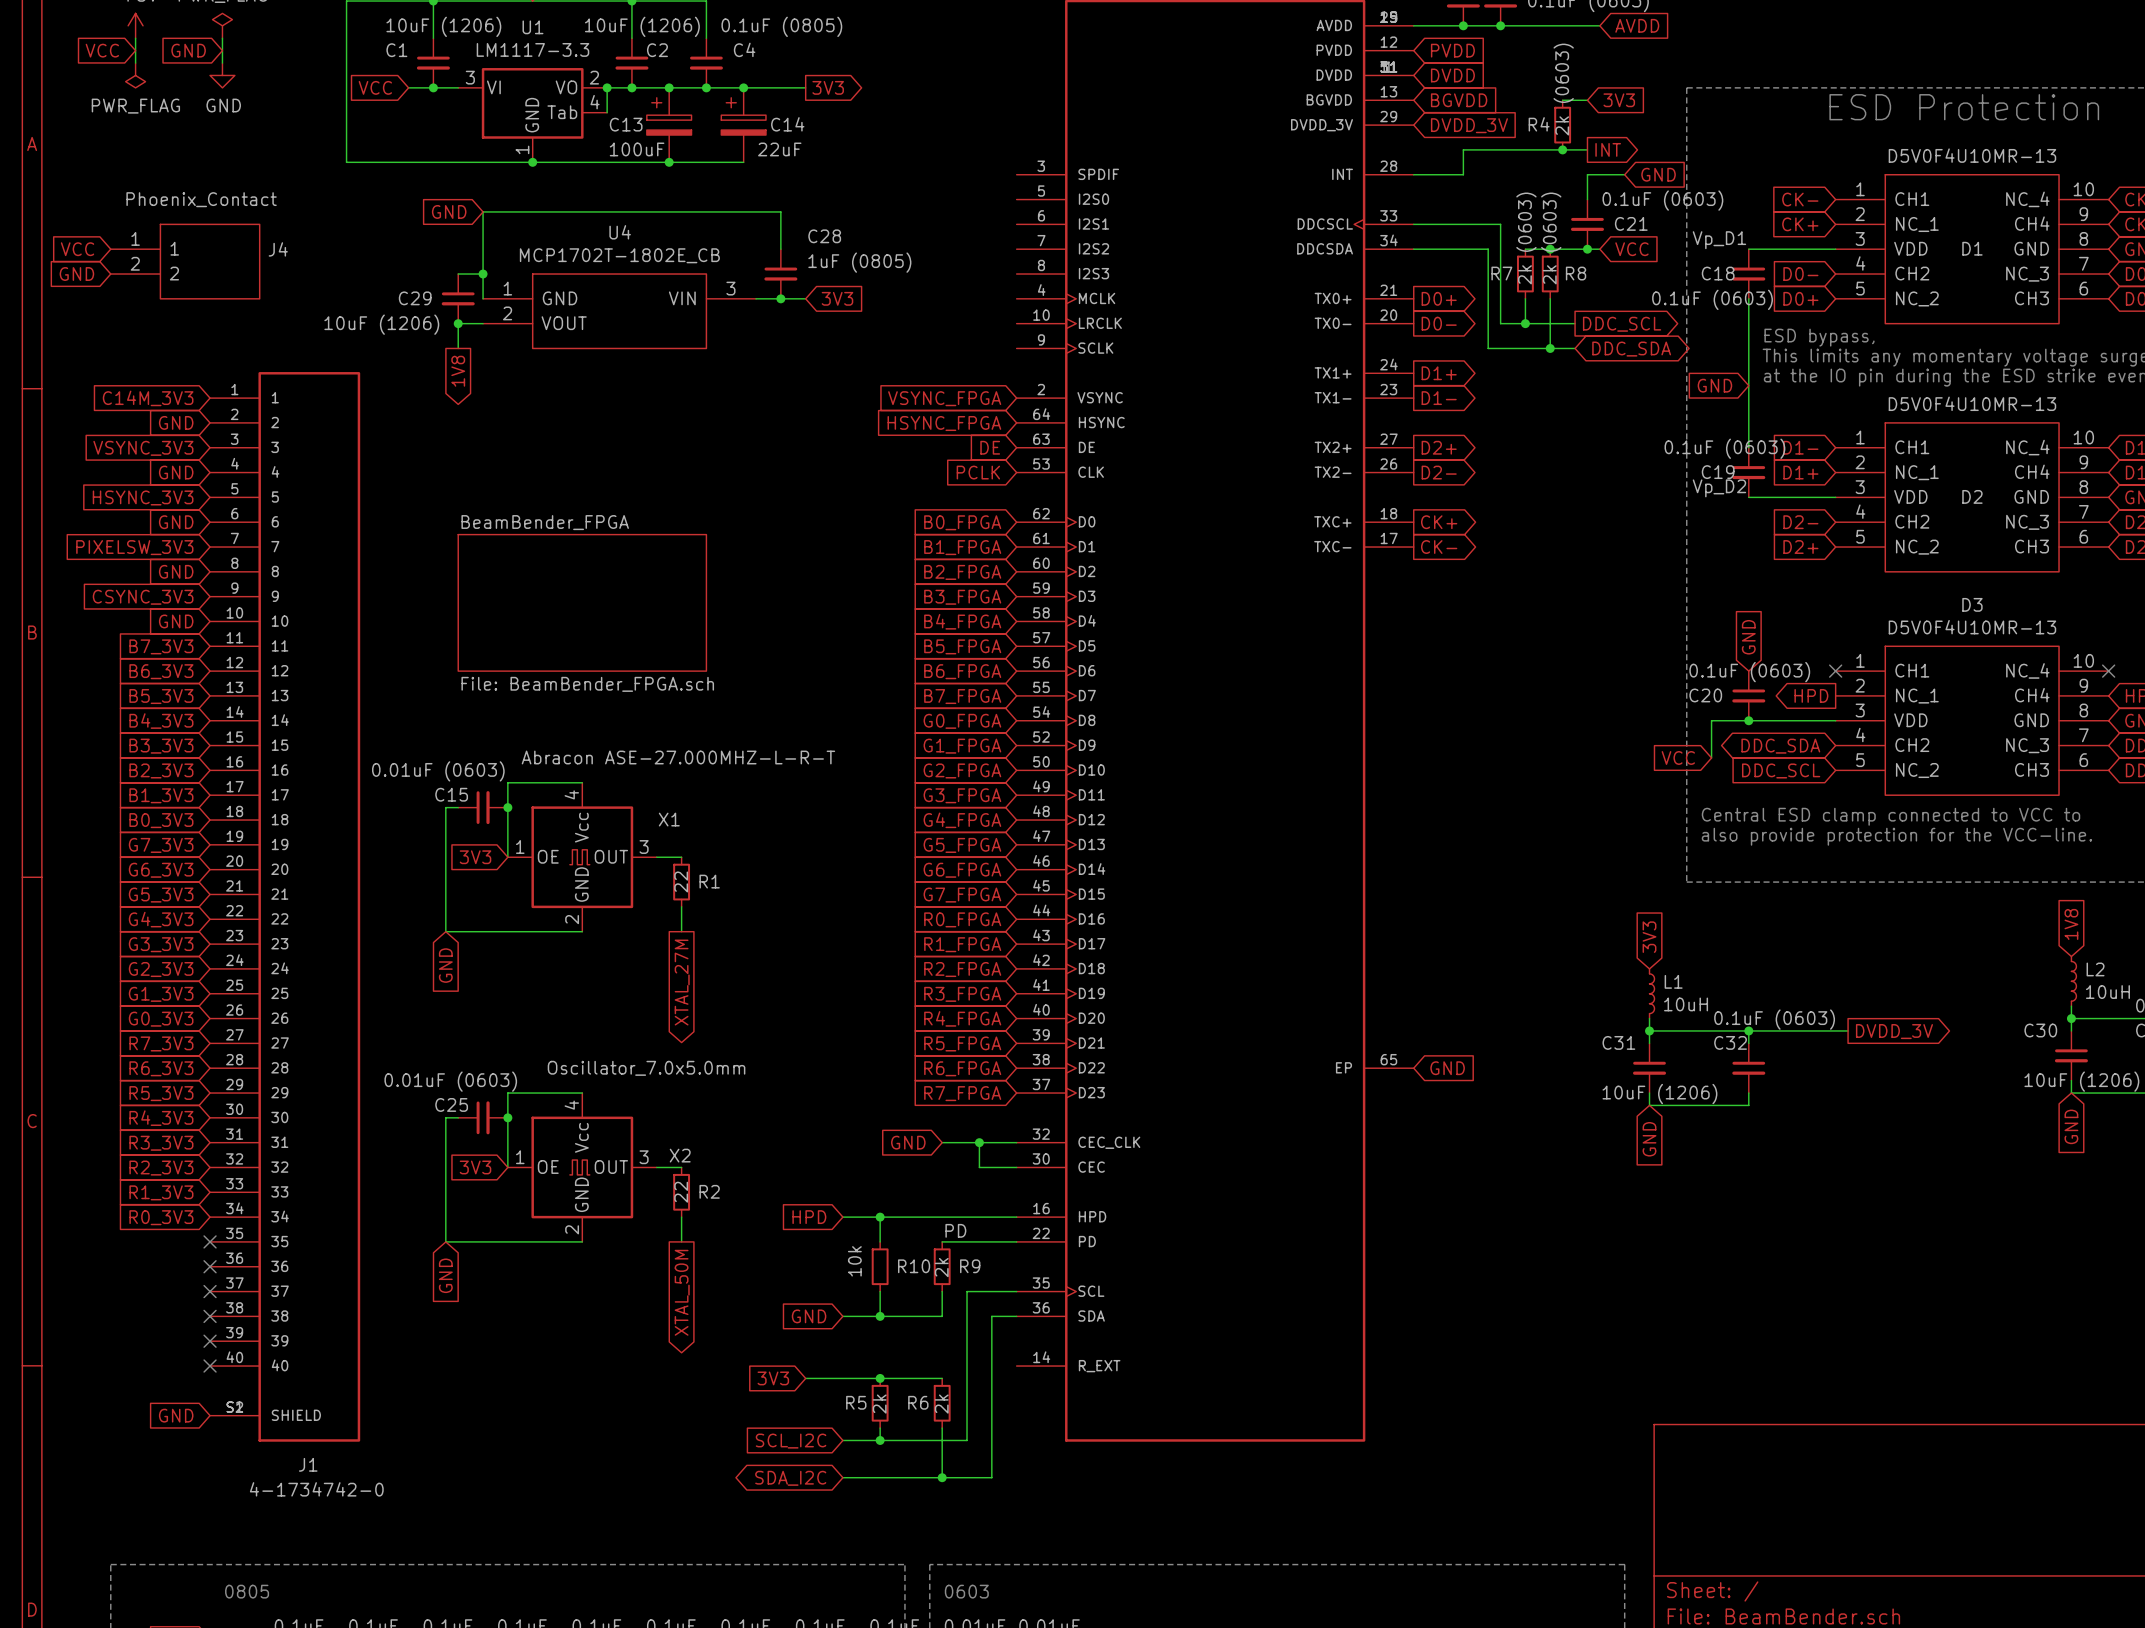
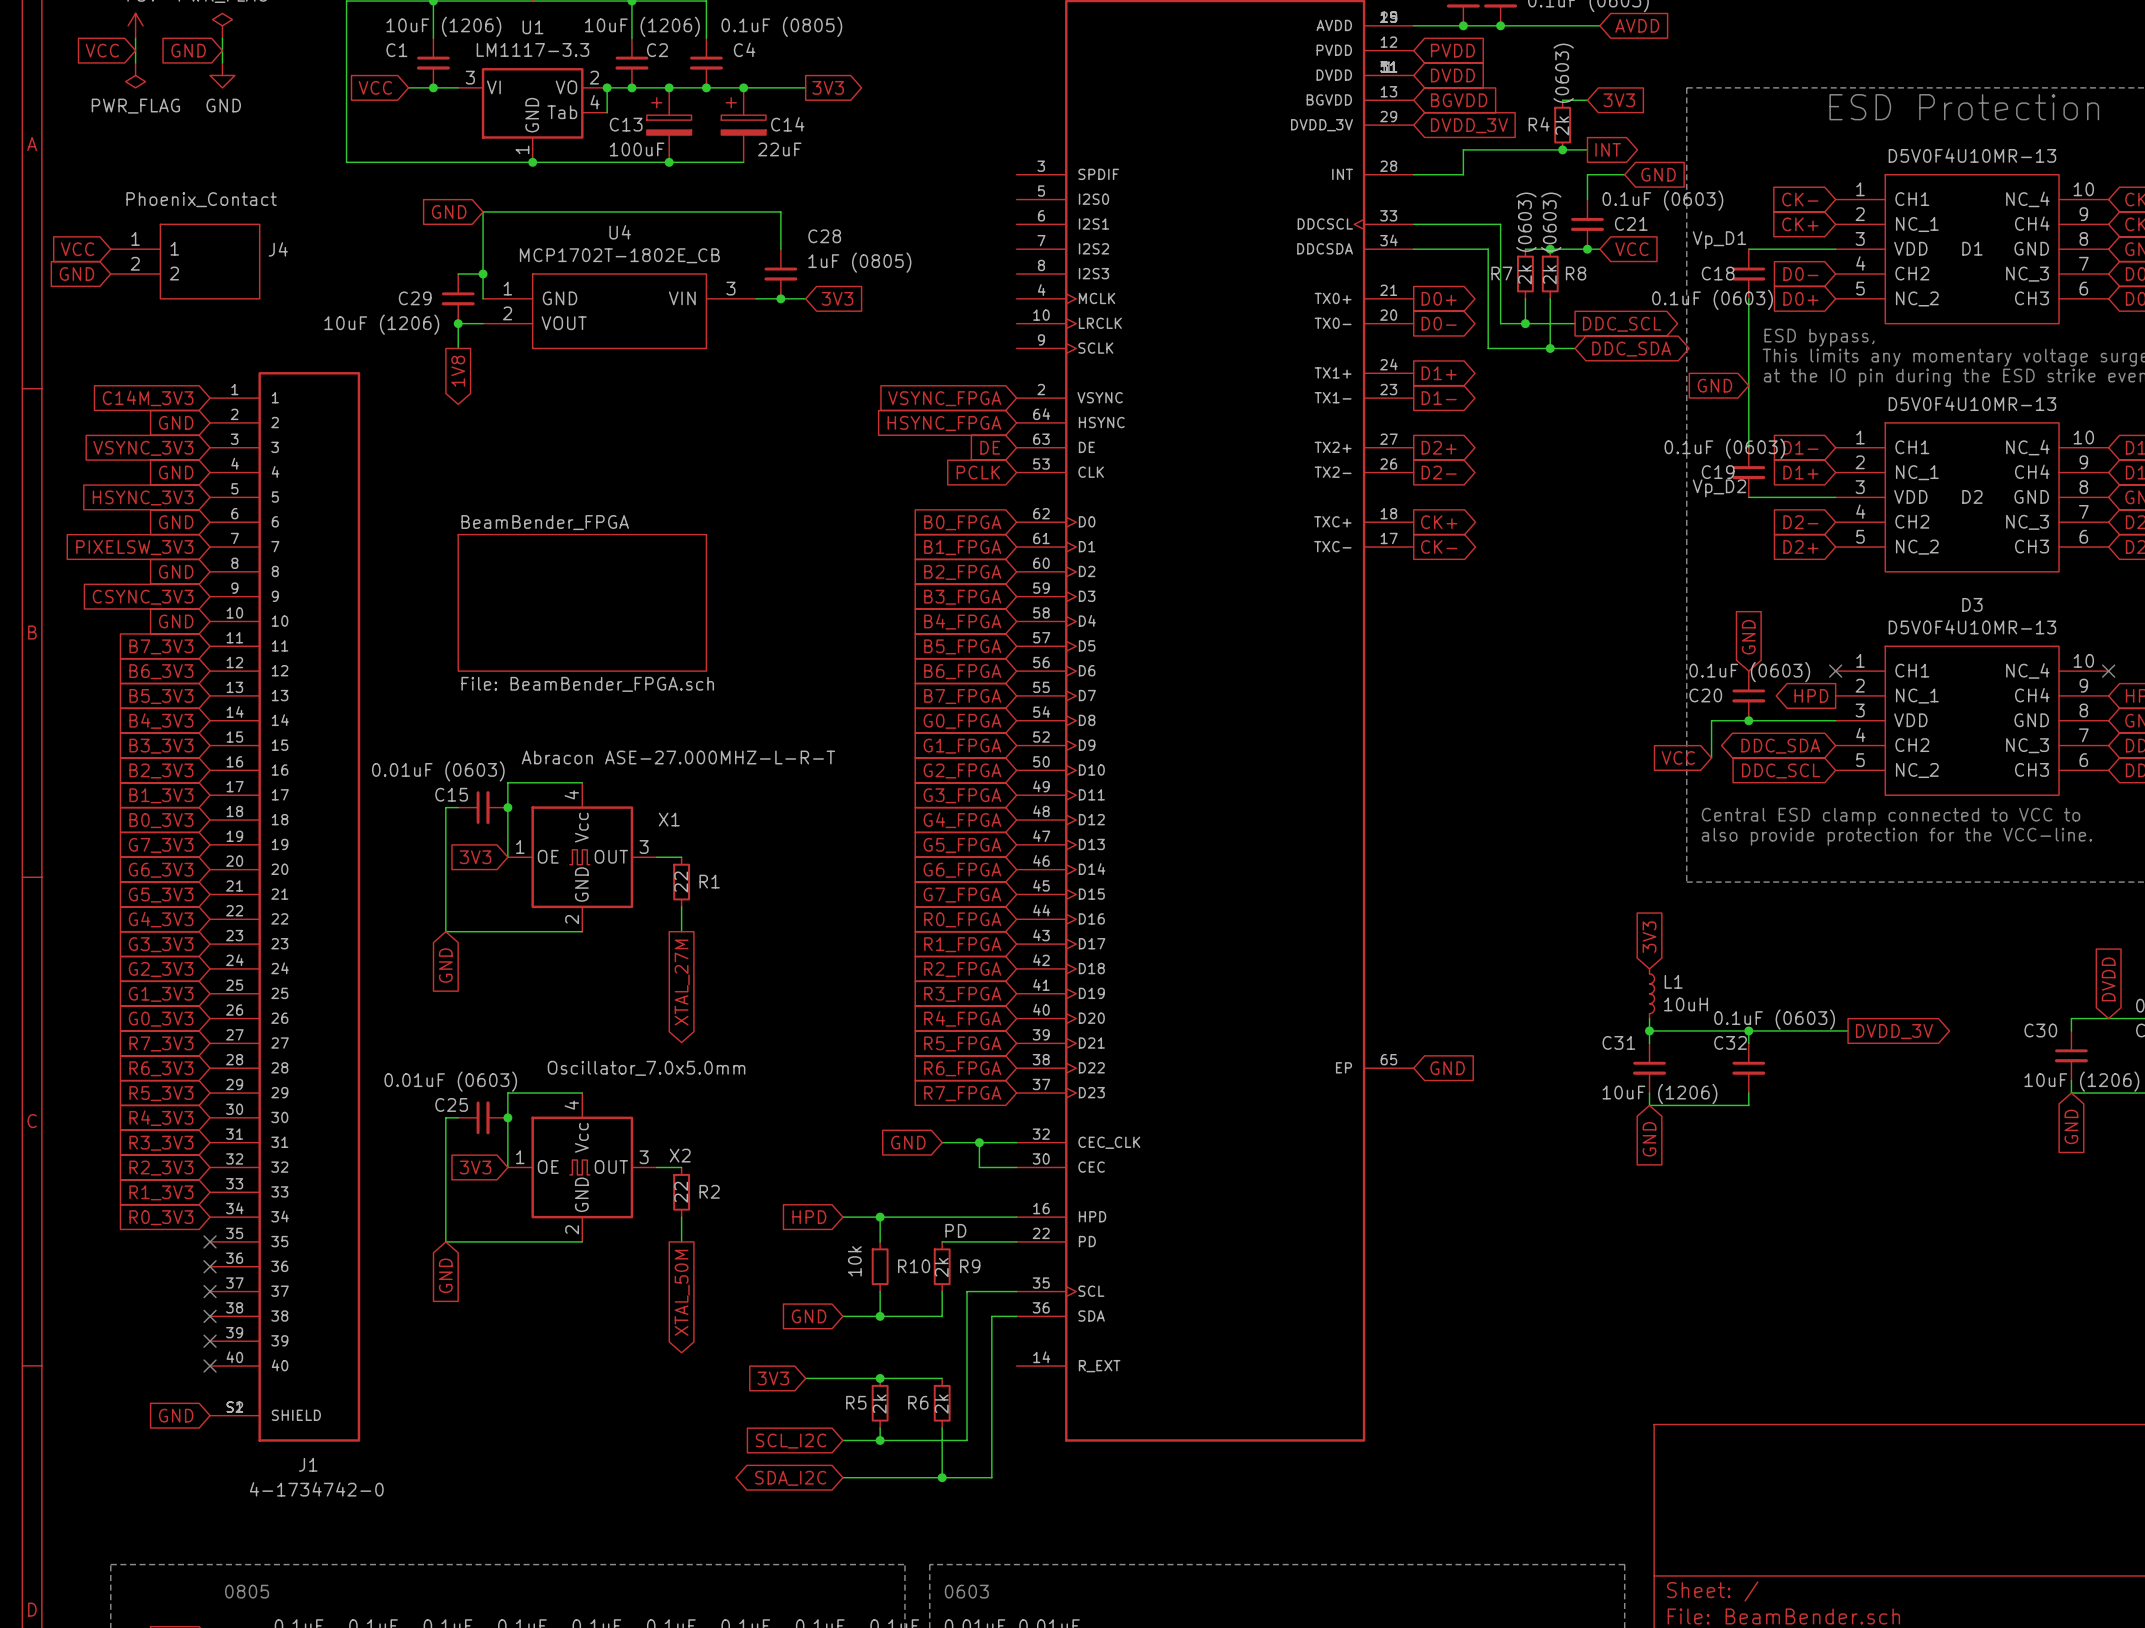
global label: 1V8 (2071, 924) -> none
global label: none -> DVDD (2108, 979)
L2: 10uH (2073, 981) -> none
wire: (2071, 1006) (2071, 1018) -> none
junction: (2071, 1018) -> none

